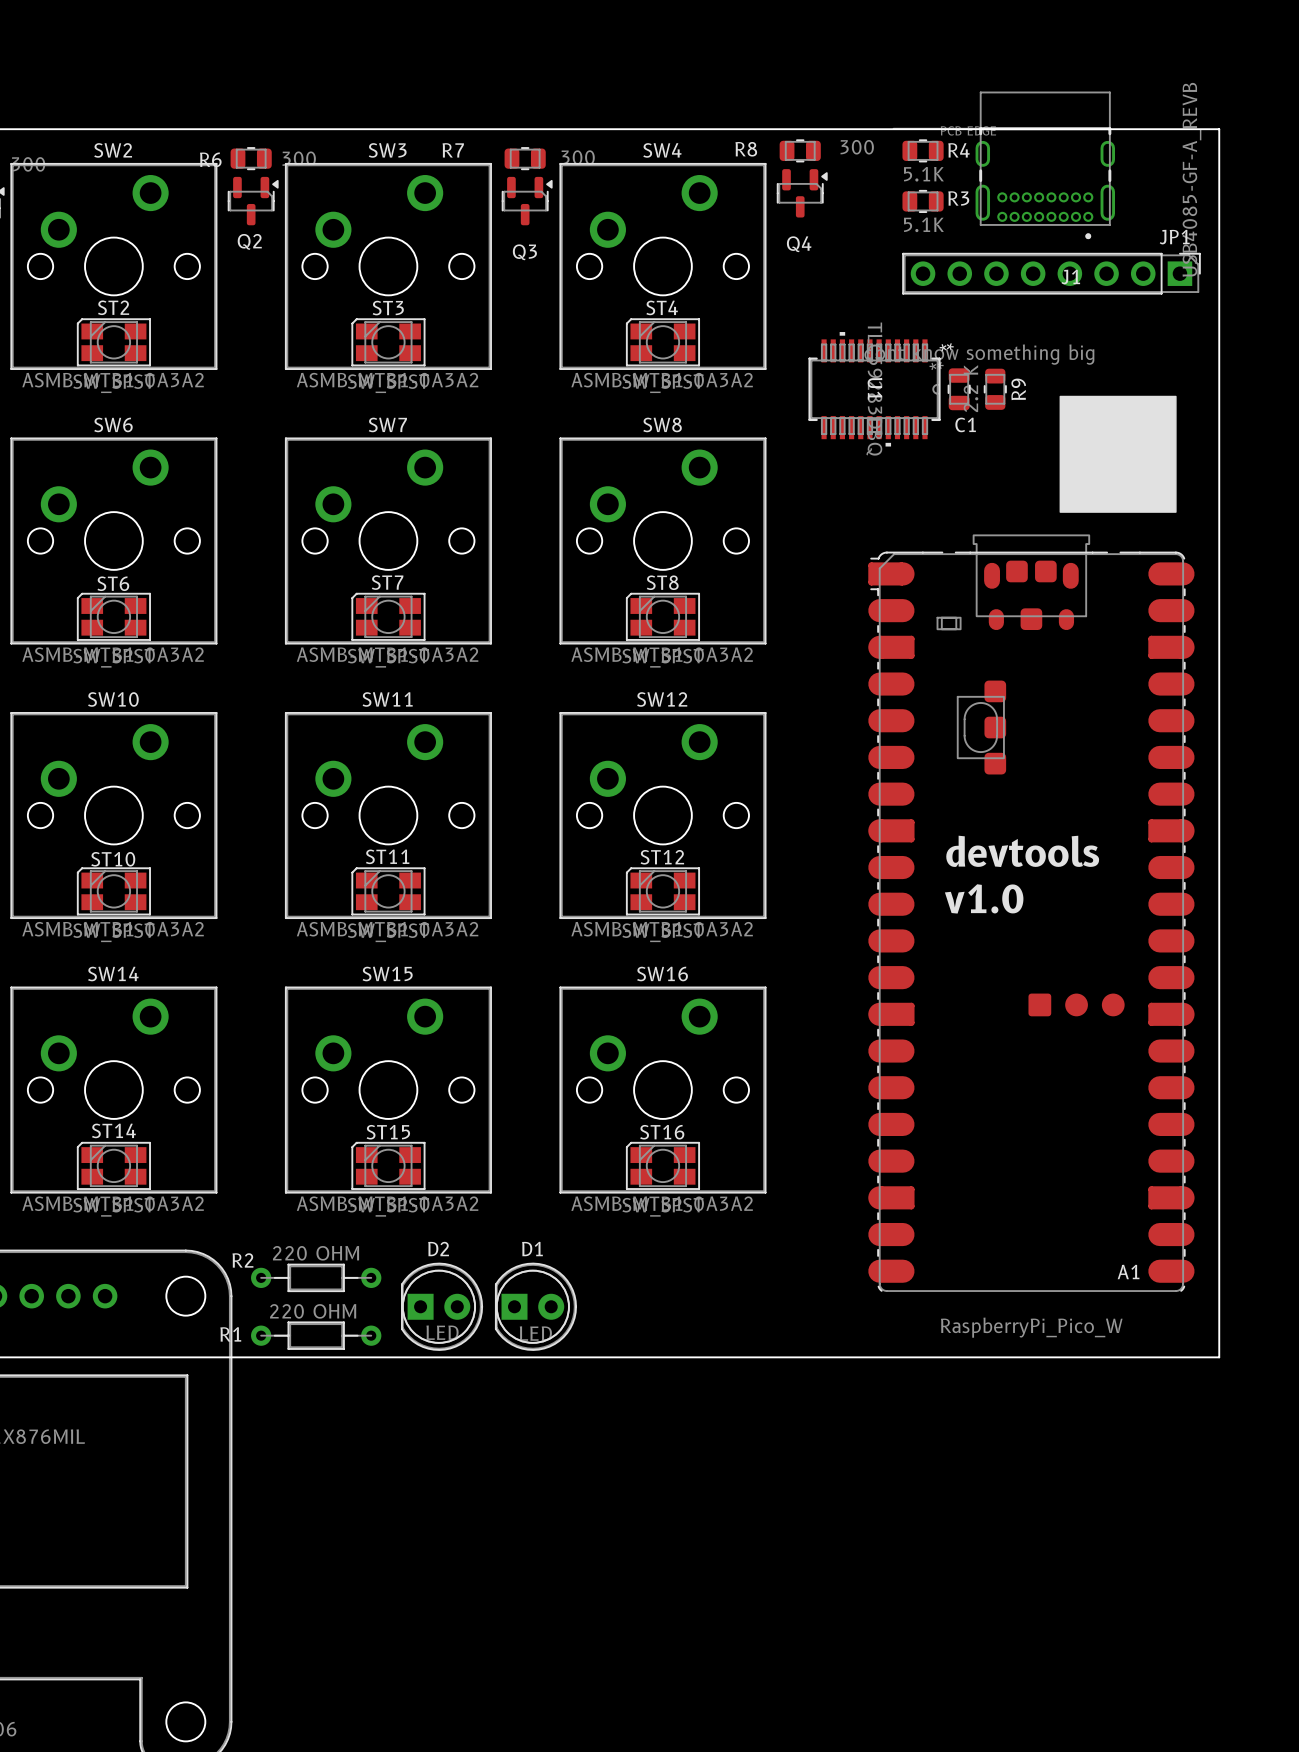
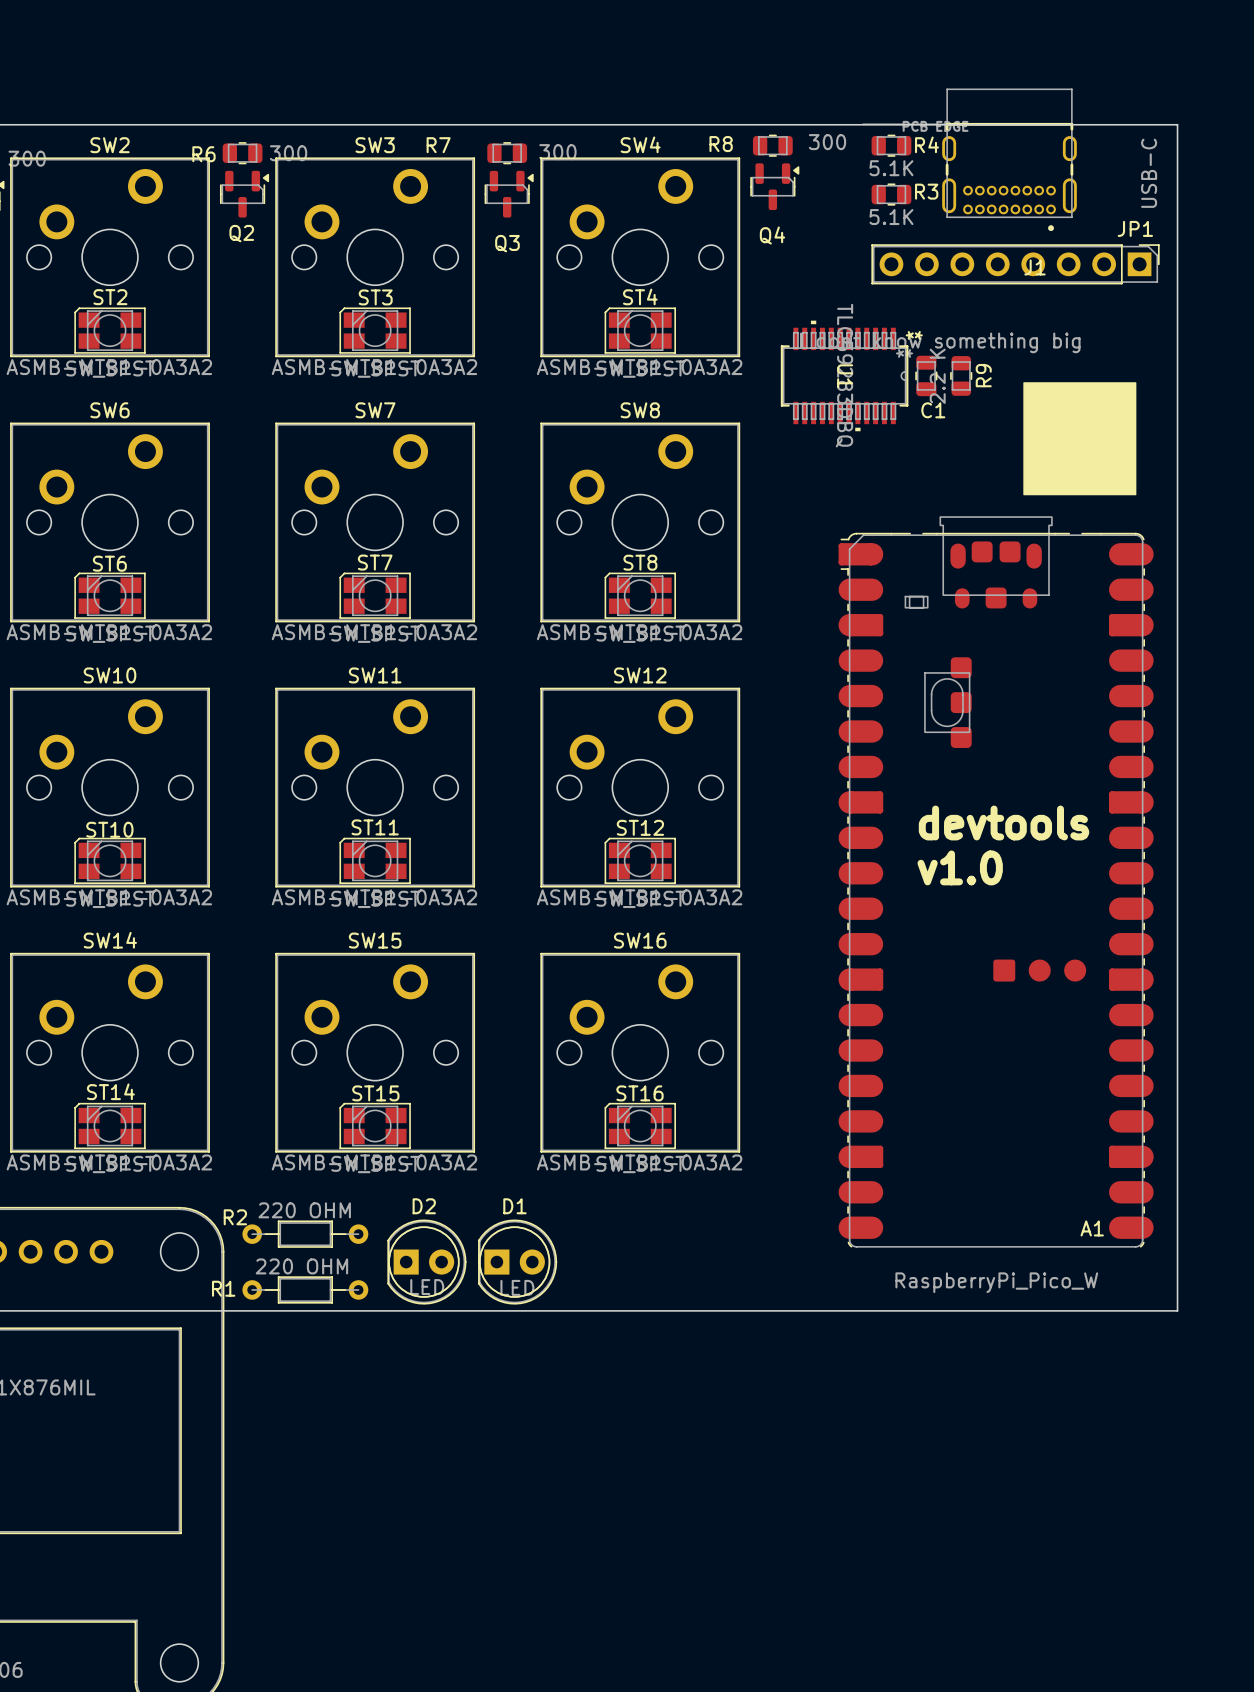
J1 value: USB4085-GF-A_REVB (1191, 179) -> USB-C (1149, 173)

